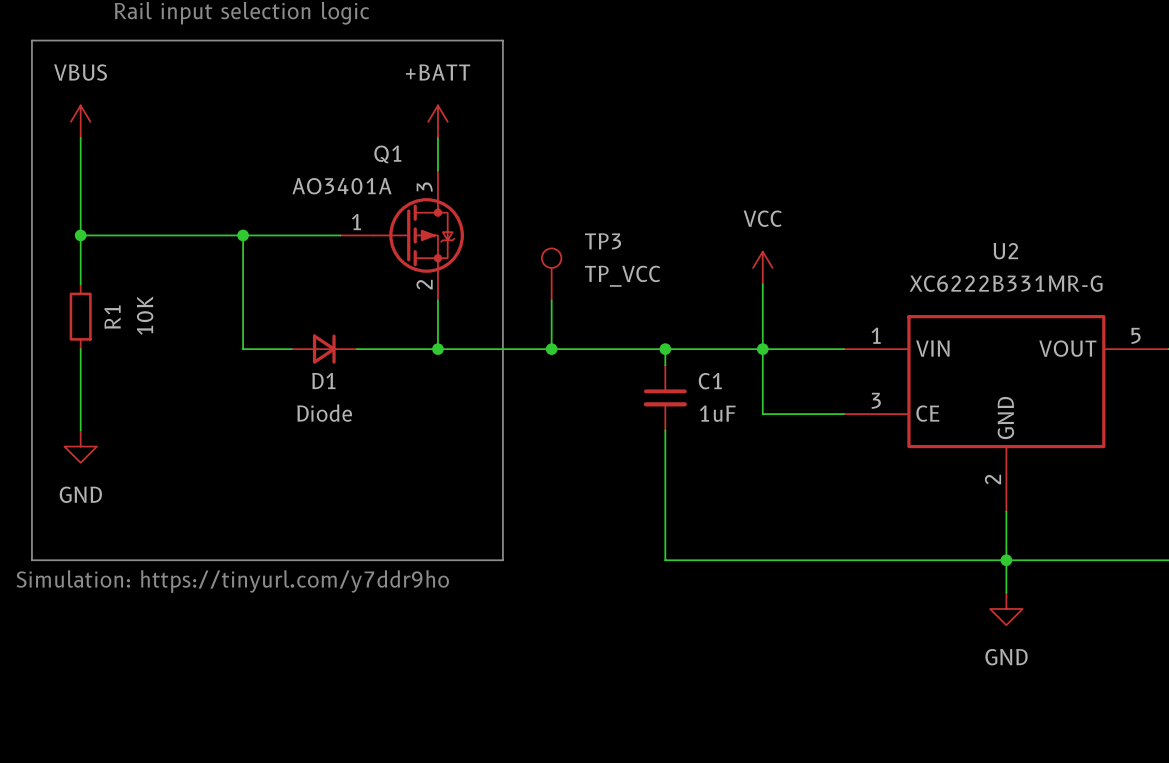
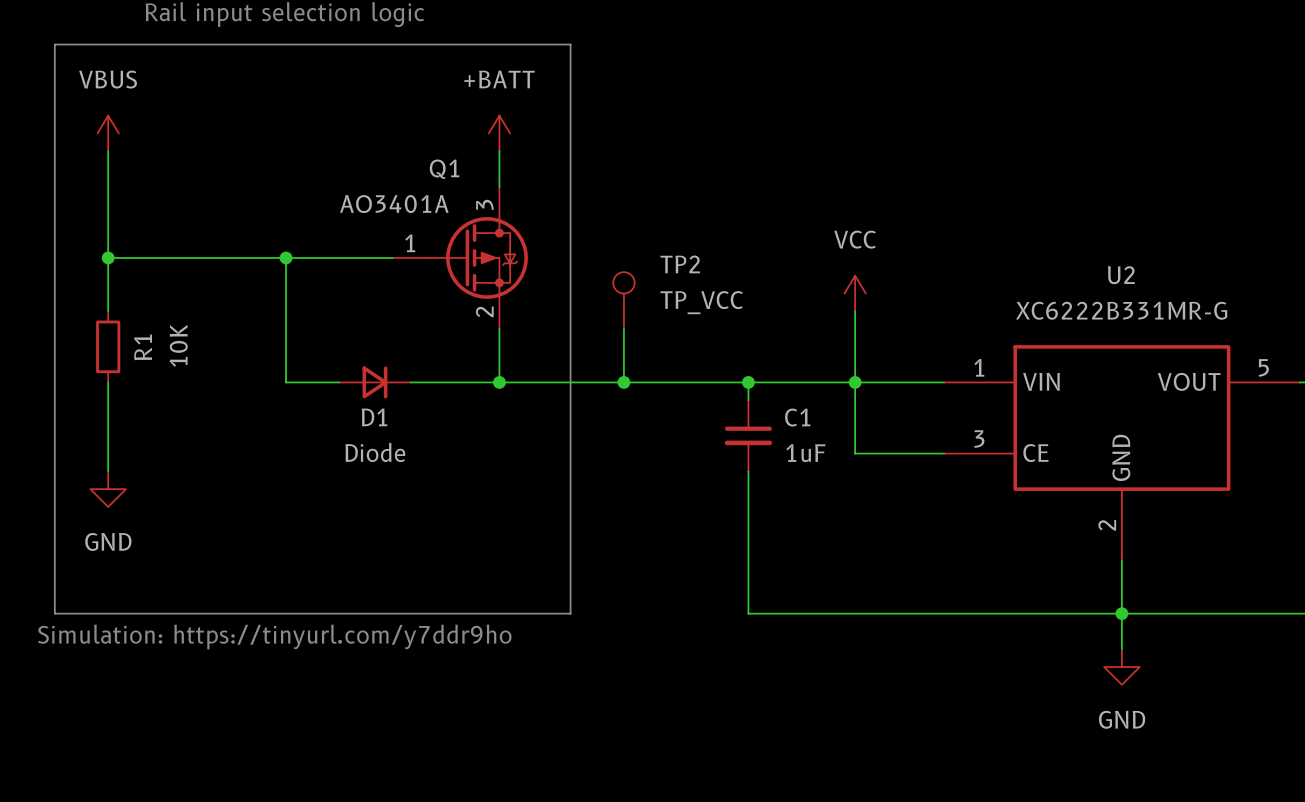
TP3 name: TP3 (603, 241) -> TP2 (680, 264)

